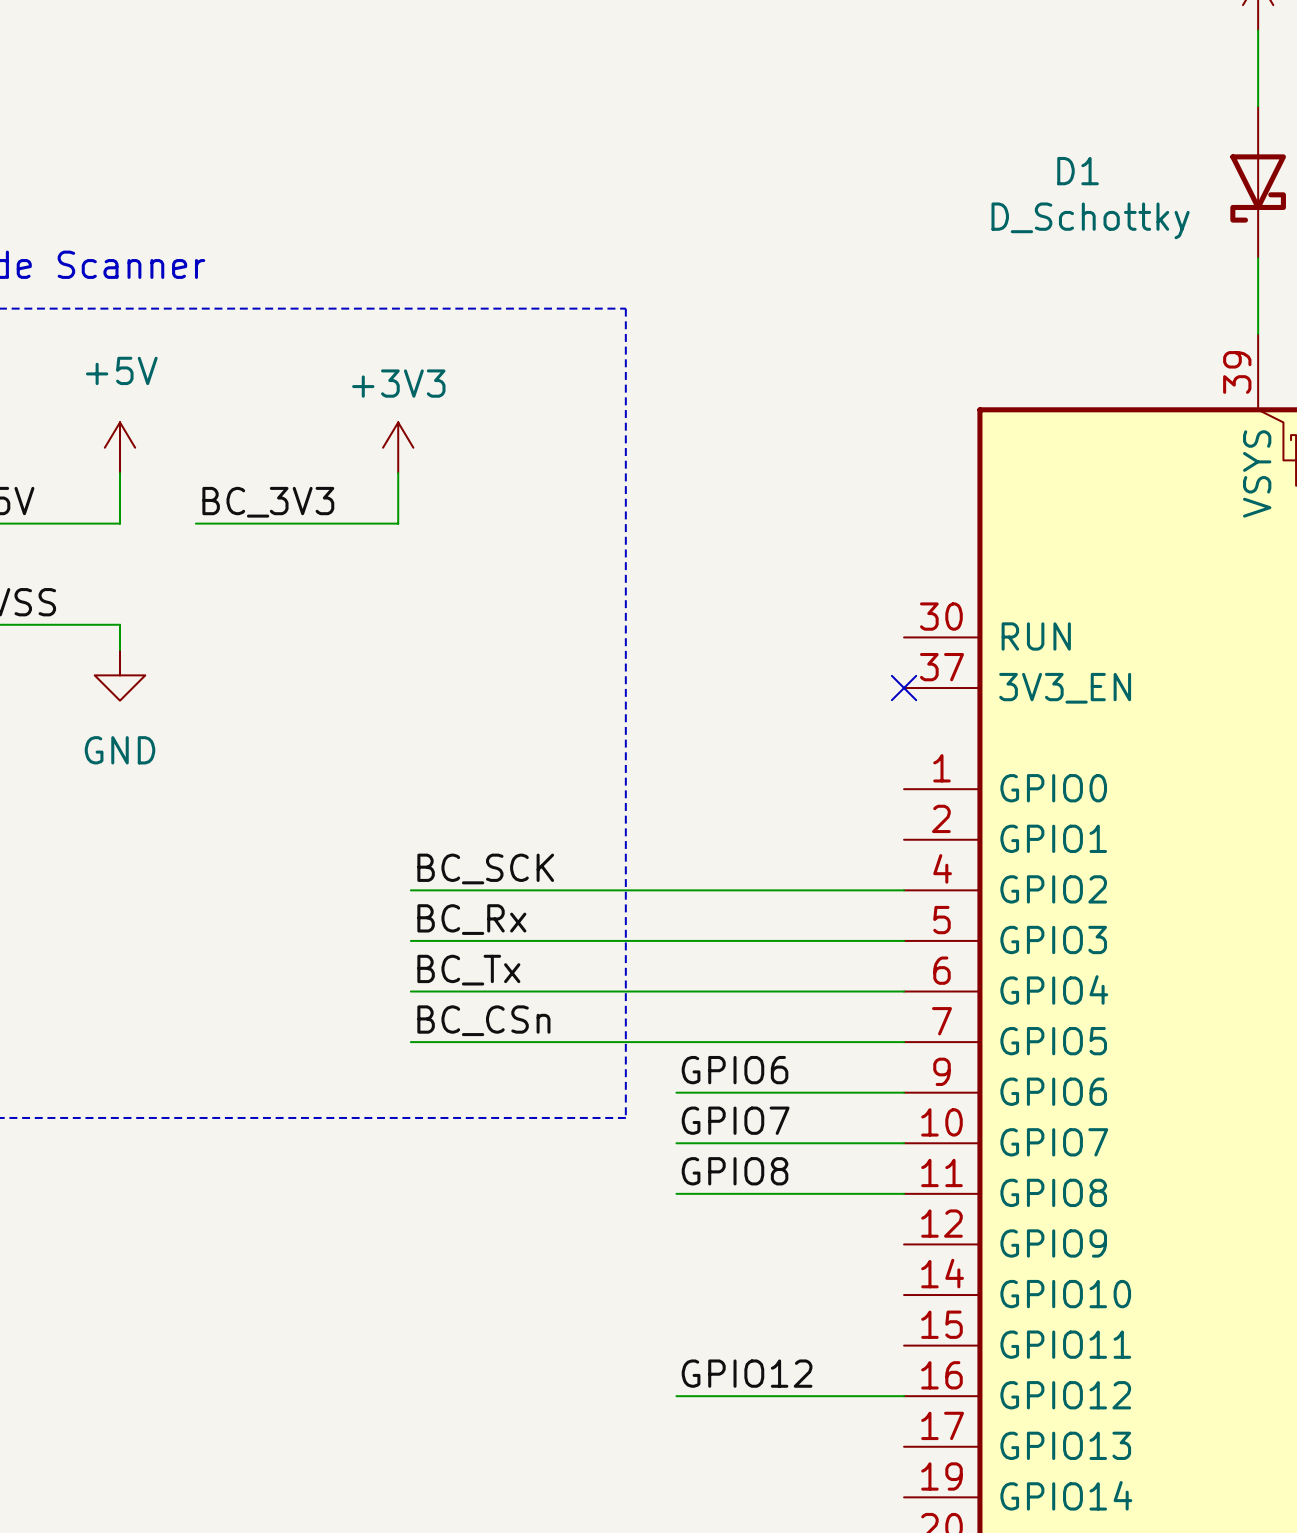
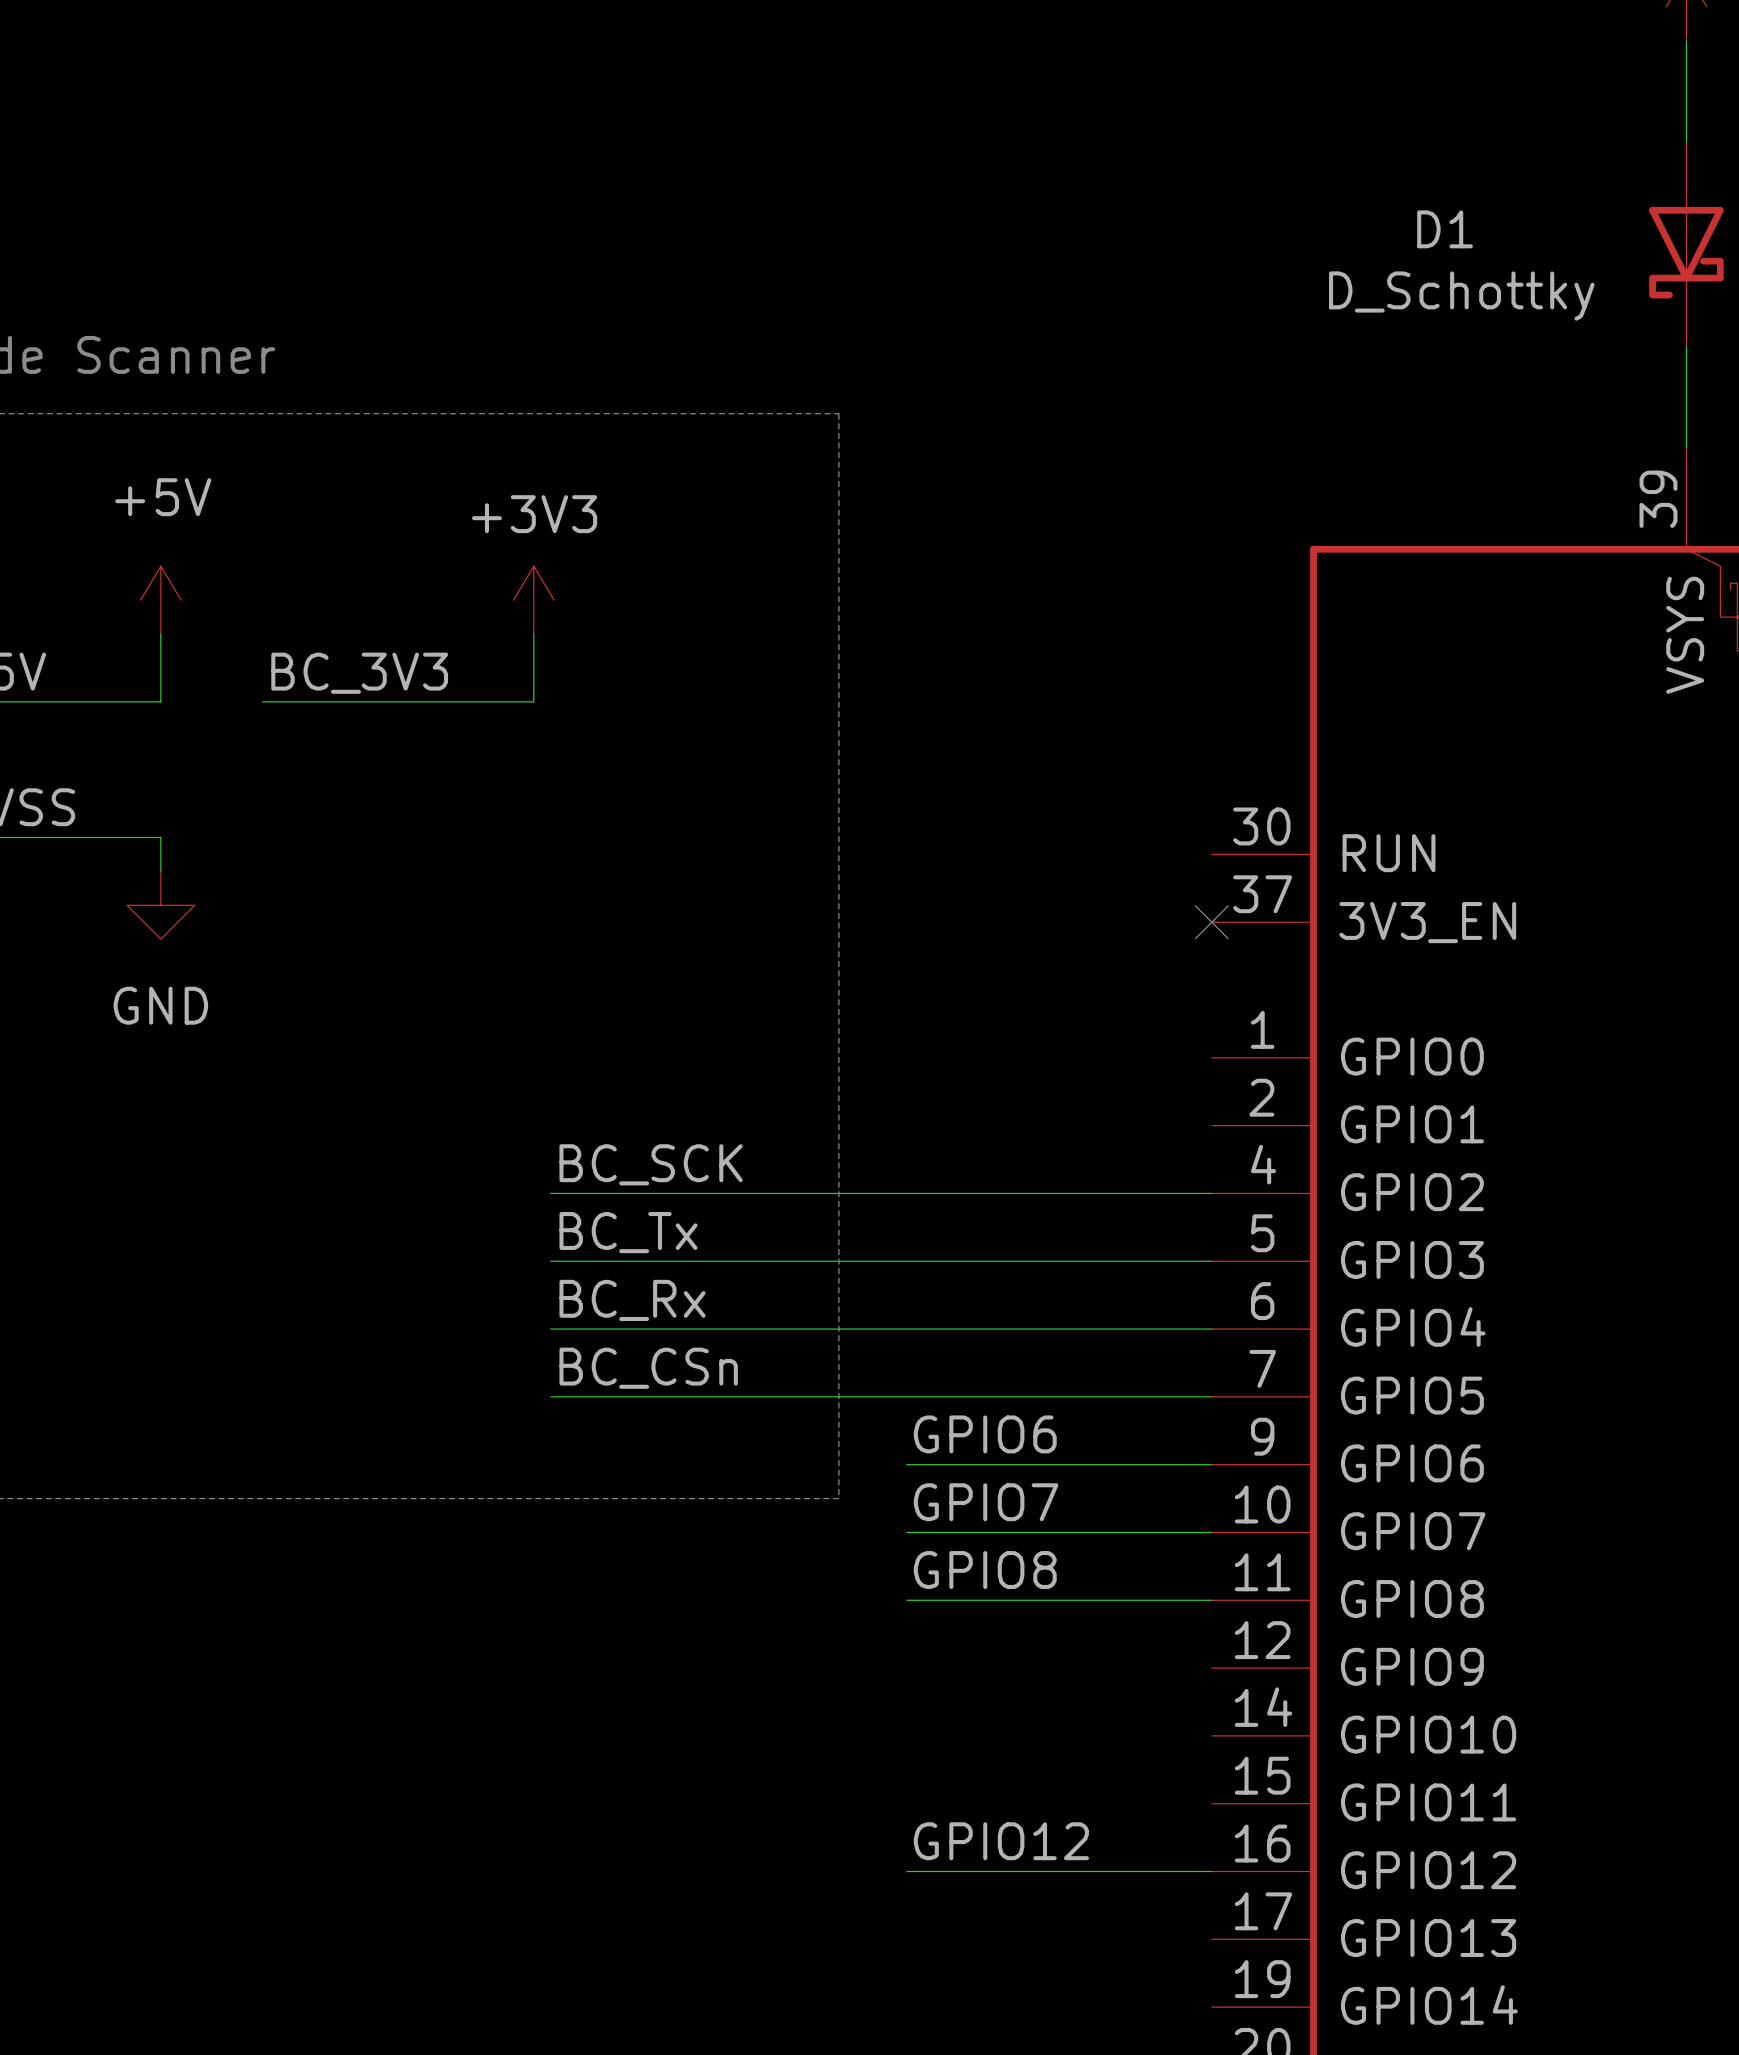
label: BC_Rx (471, 919) -> BC_Tx (628, 1232)
label: BC_Tx (468, 970) -> BC_Rx (632, 1300)

